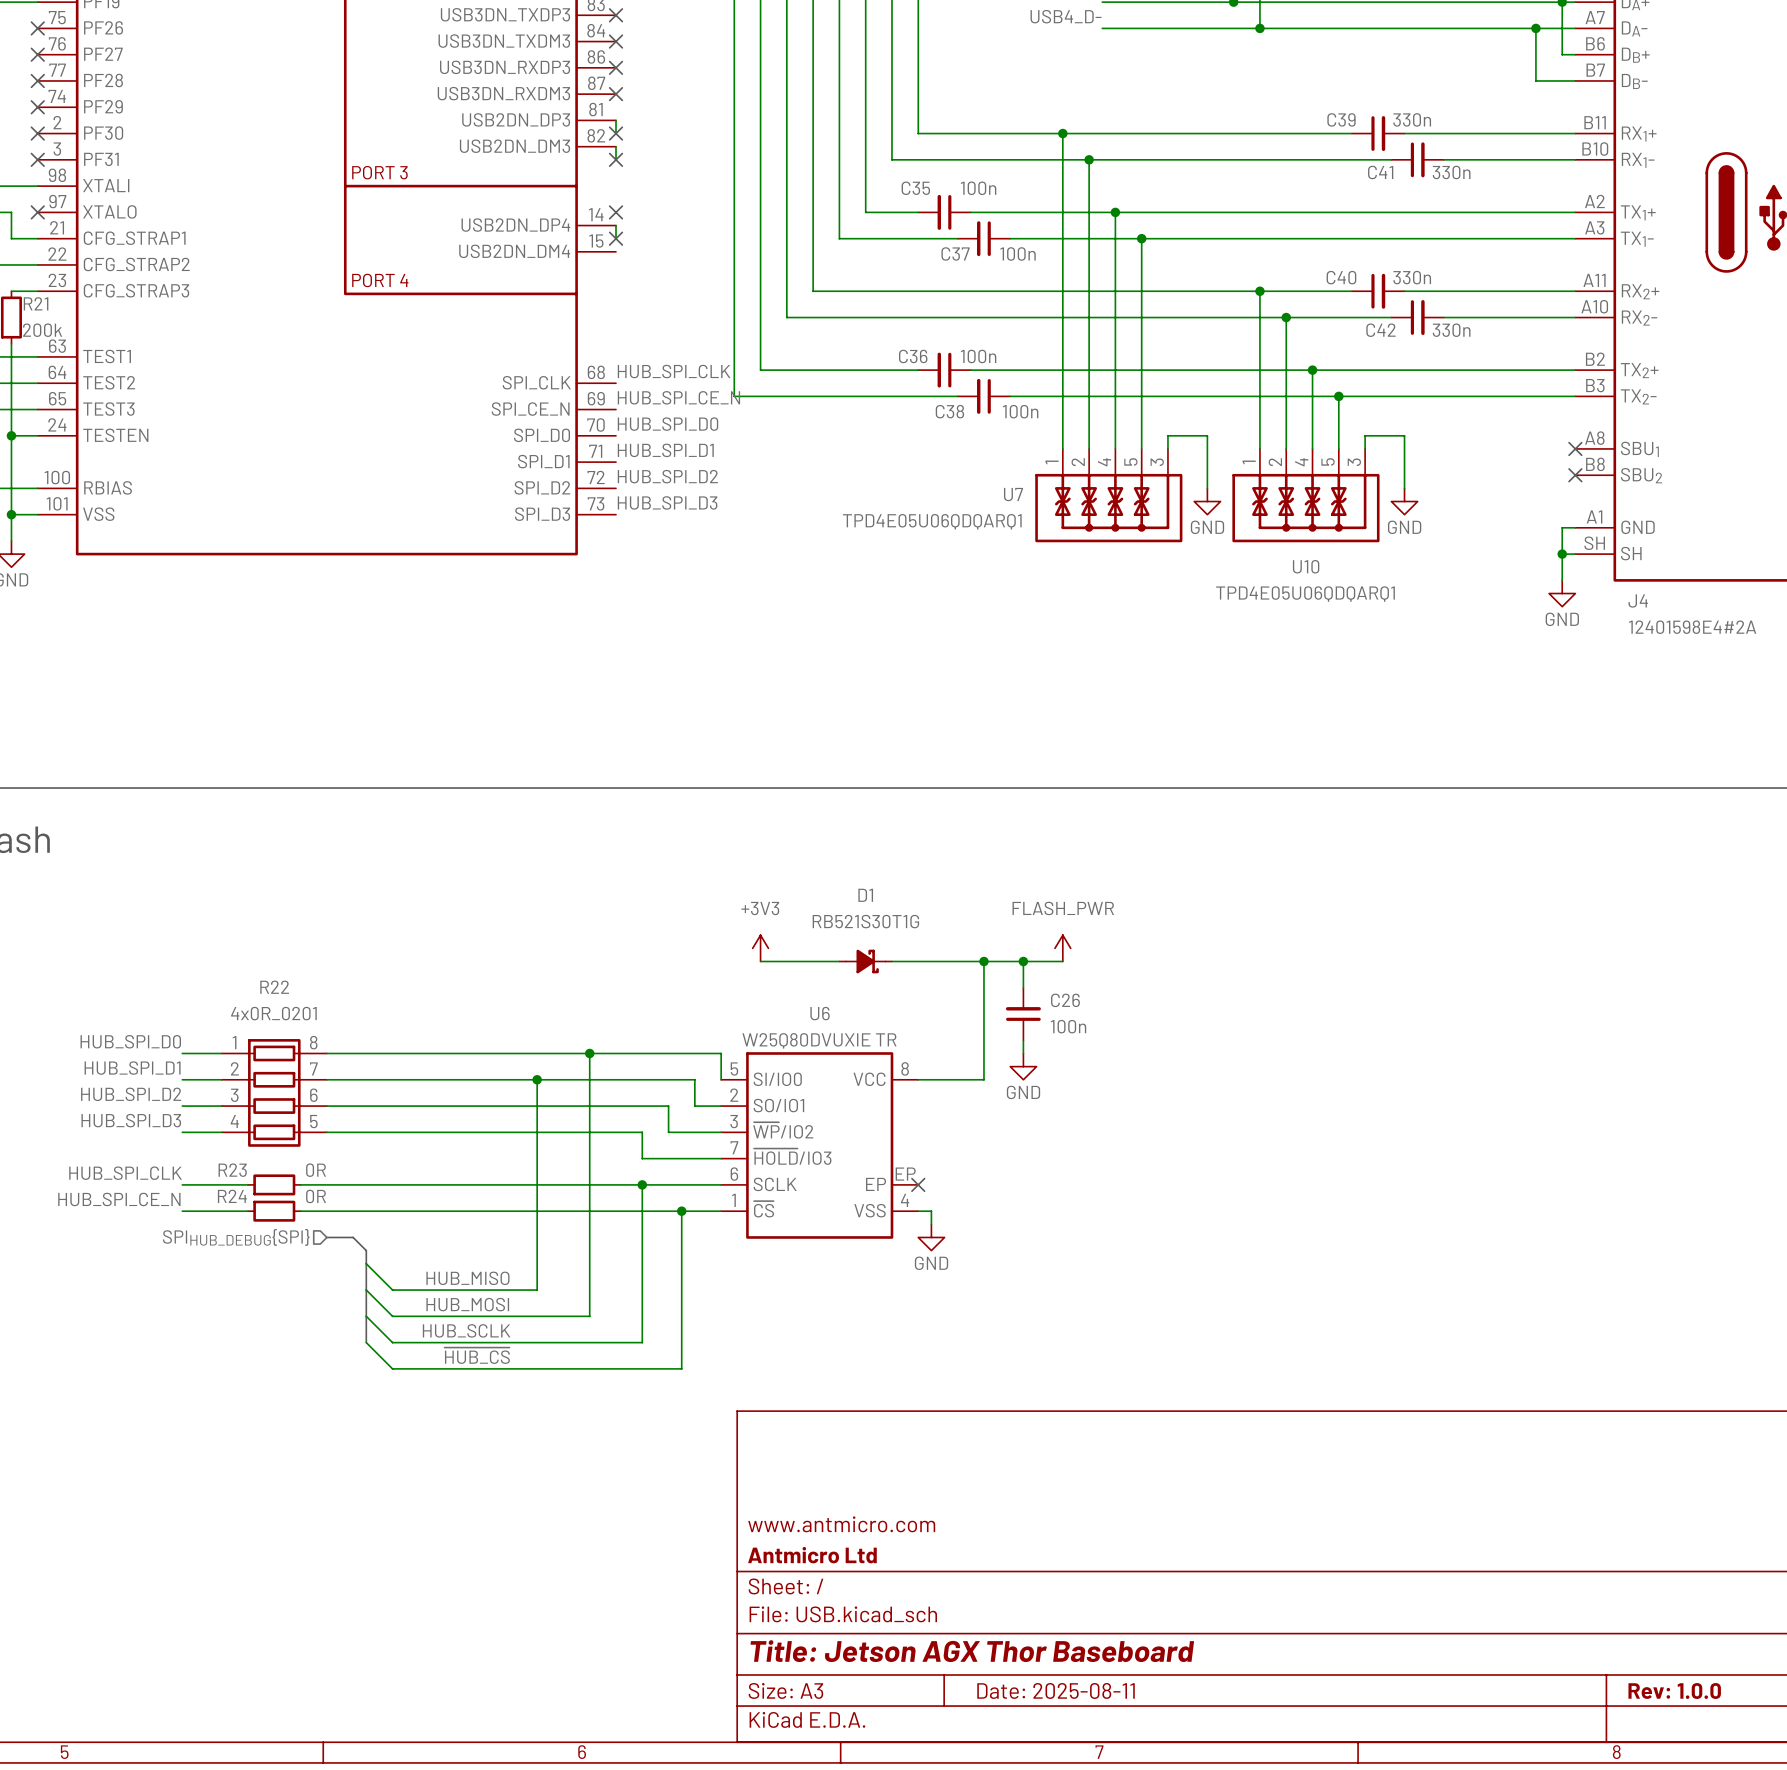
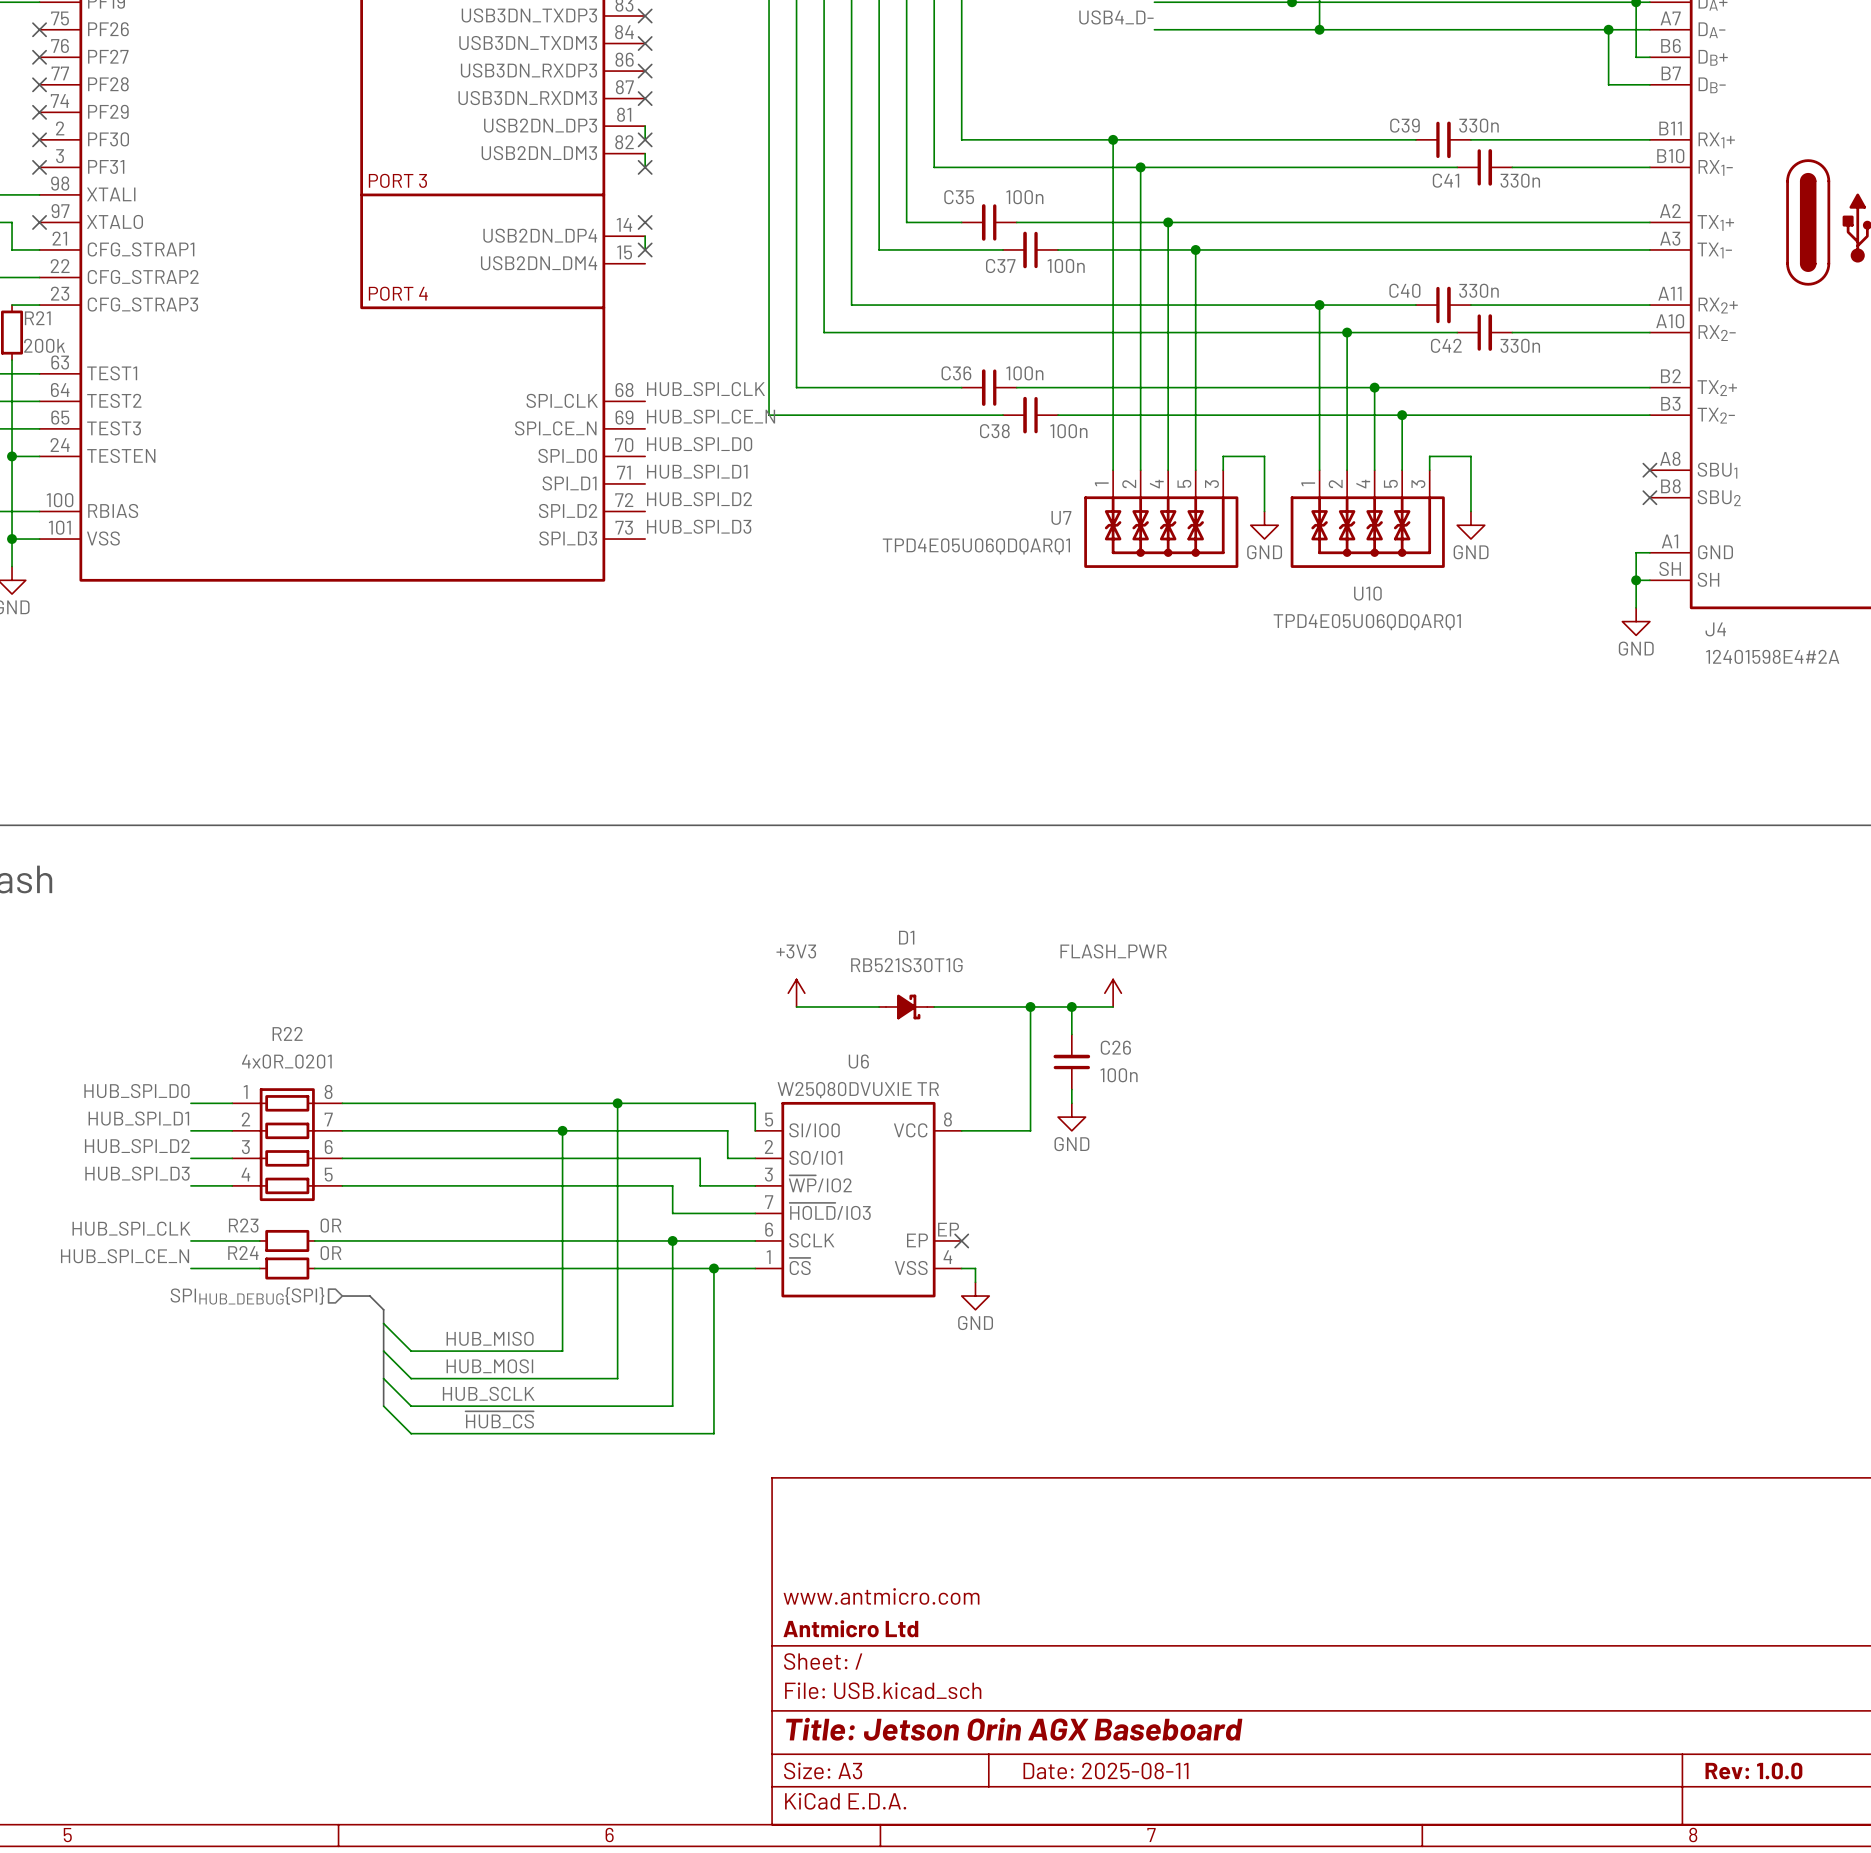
title block: Title: Jetson AGX Thor Baseboard (972, 1651) -> Title: Jetson Orin AGX Baseboard (1014, 1729)

